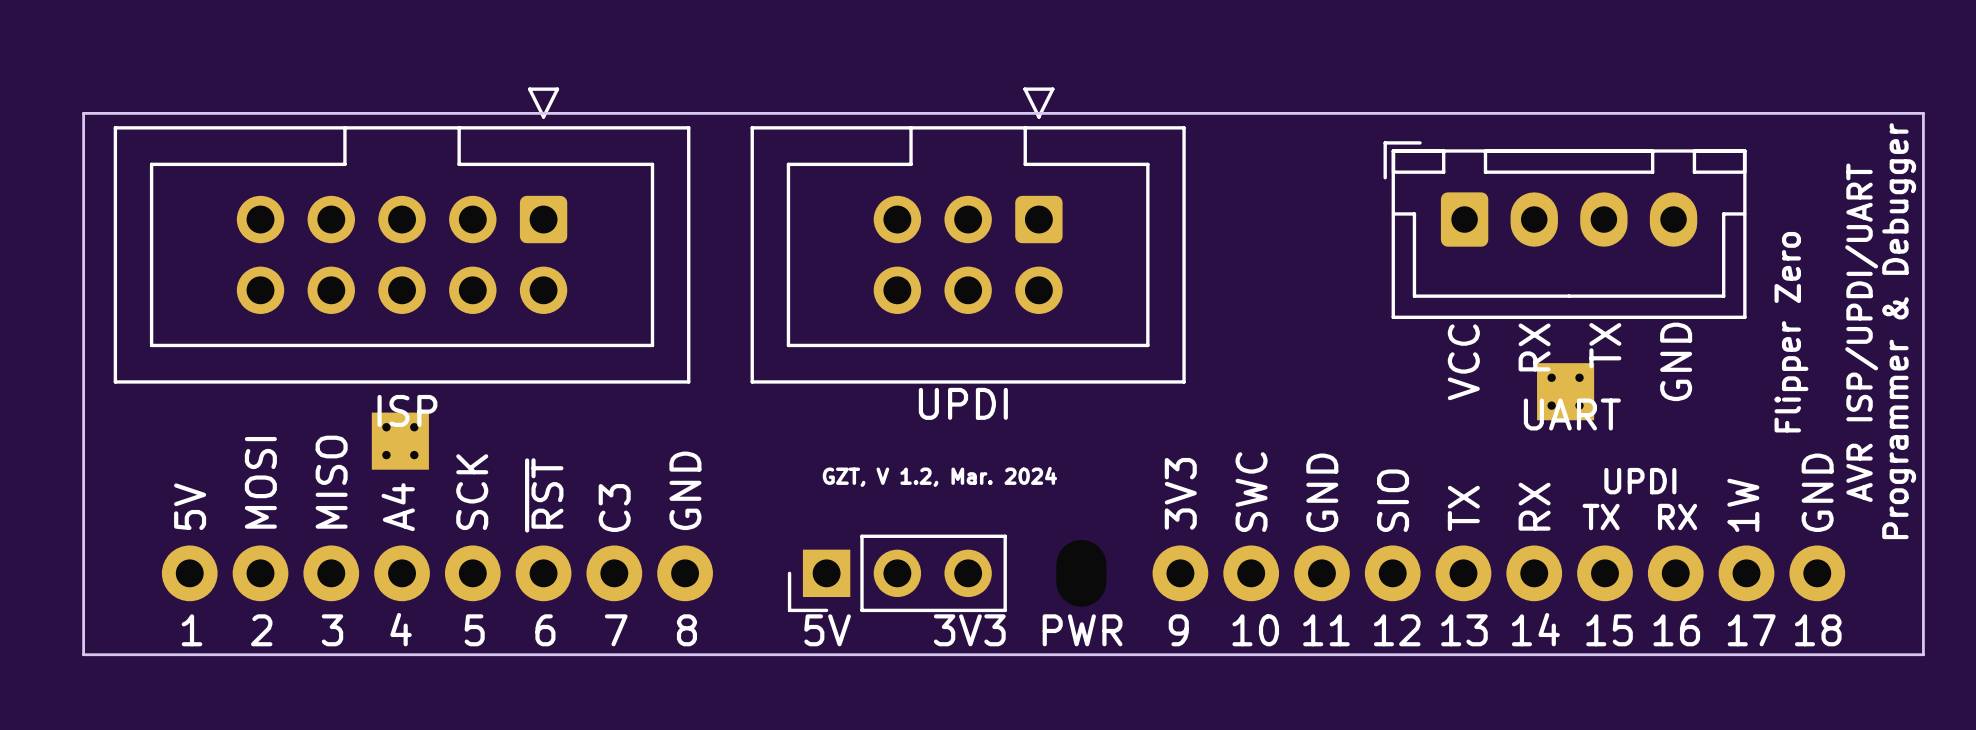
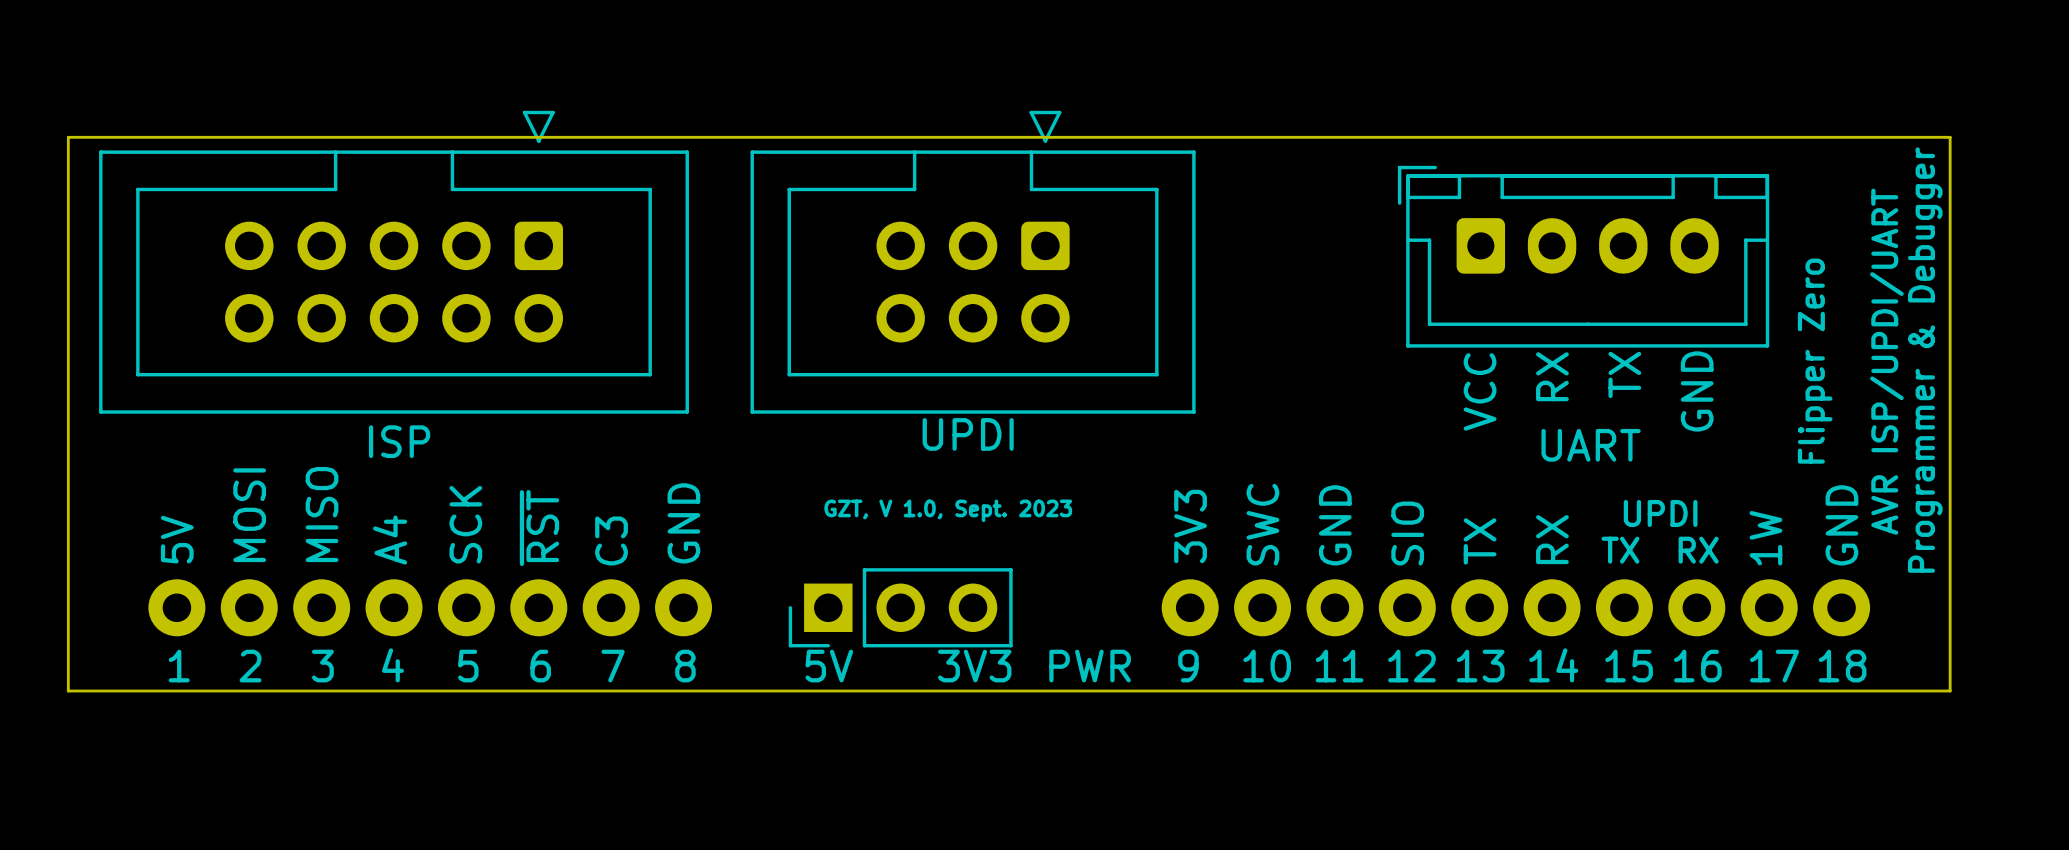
part: (1565, 391) -> none
part: (400, 441) -> none
text: GZT, V 1.2, Mar. 2024 (939, 476) -> GZT, V 1.0, Sept. 2023 (948, 510)

